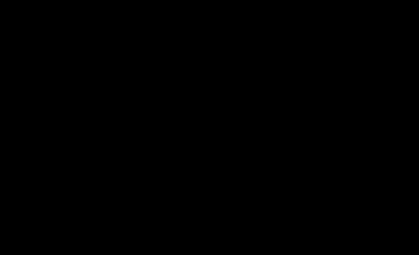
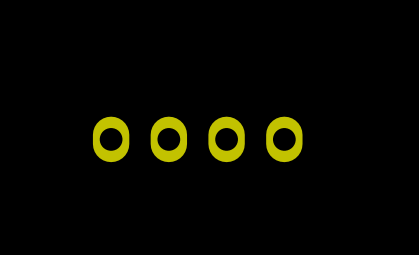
part: none -> (197, 139)

